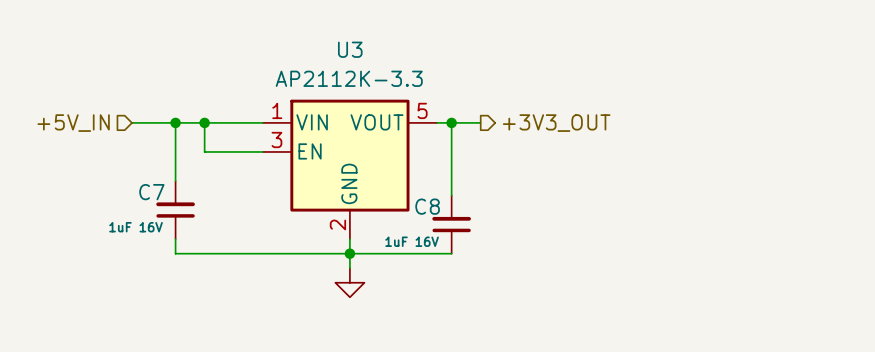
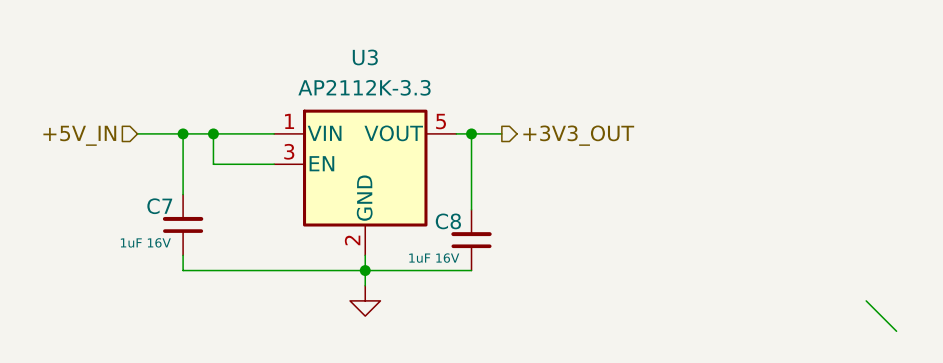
wire: none -> (866, 300) (896, 331)

